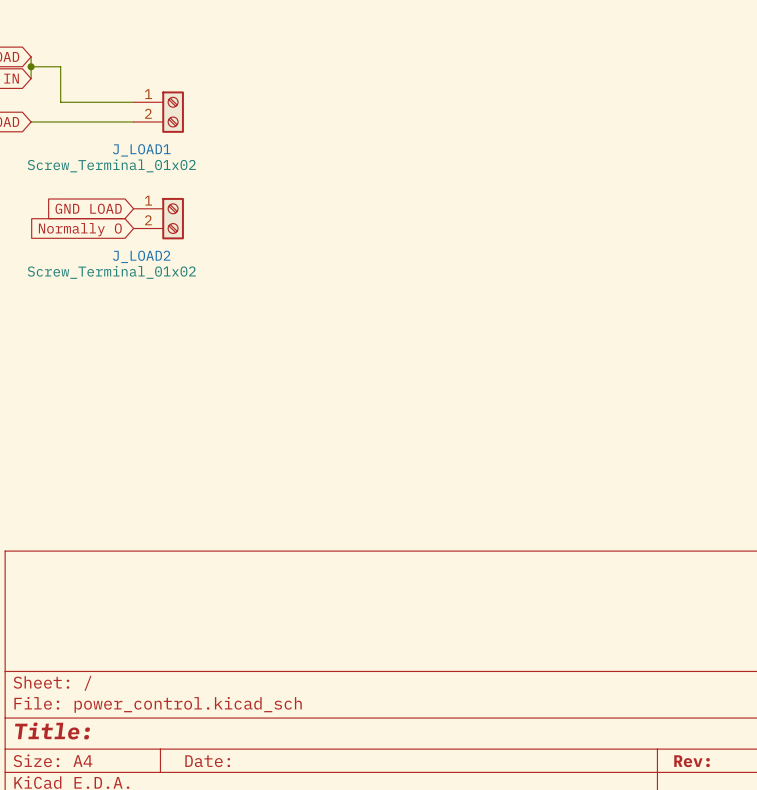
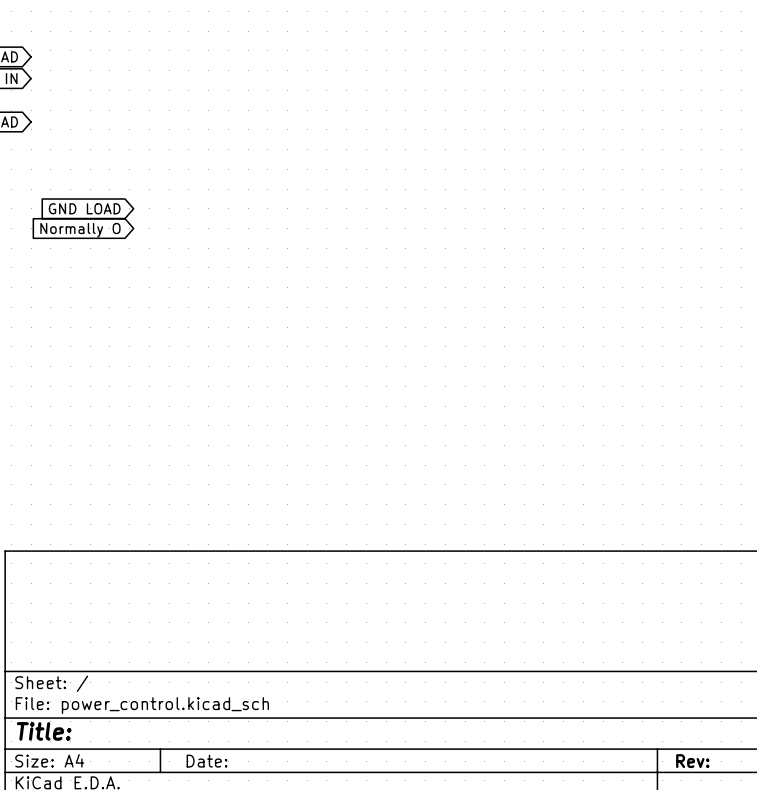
wire: (31, 56) (31, 78) -> none
wire: (31, 66) (60, 66) (60, 102) (133, 102) -> none
junction: (31, 66) -> none
J_LOAD1: Screw_Terminal_01x02 (158, 112) -> none
wire: (31, 122) (133, 122) -> none
J_LOAD2: Screw_Terminal_01x02 (158, 218) -> none

